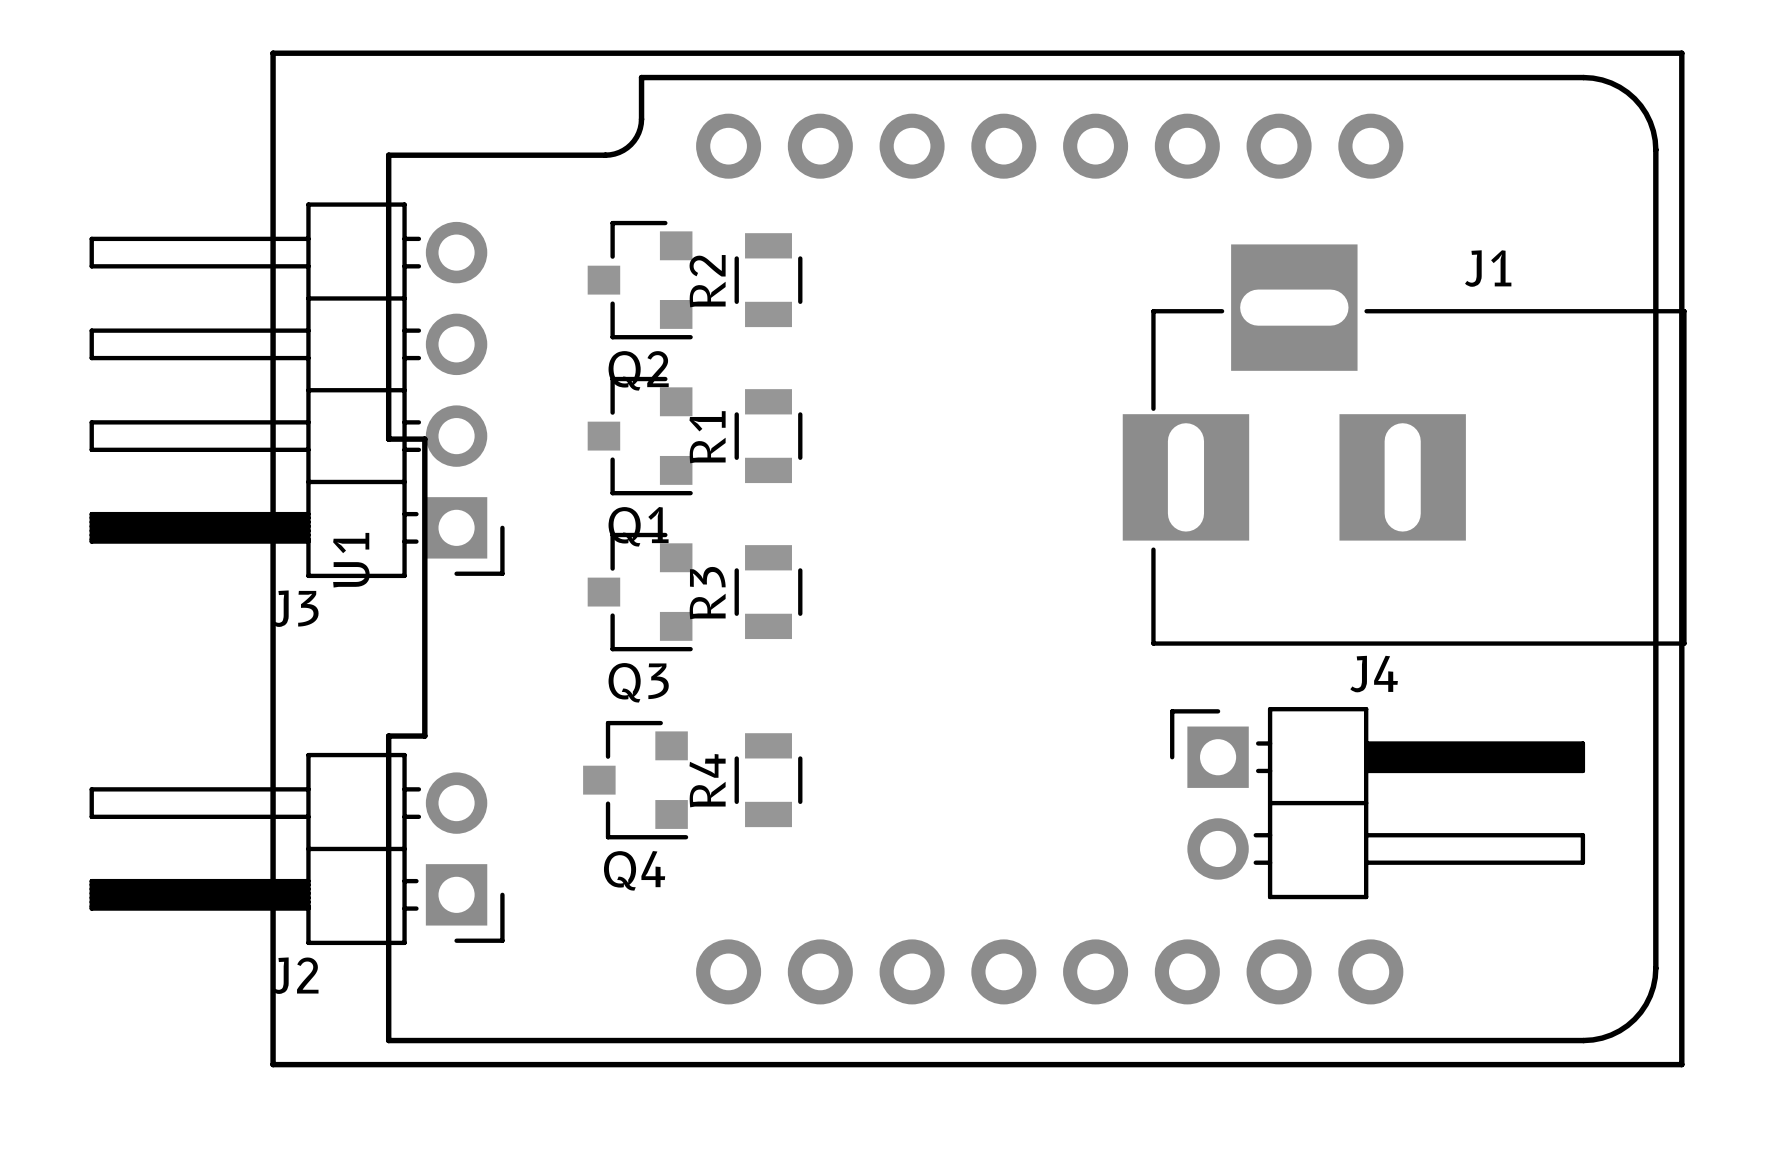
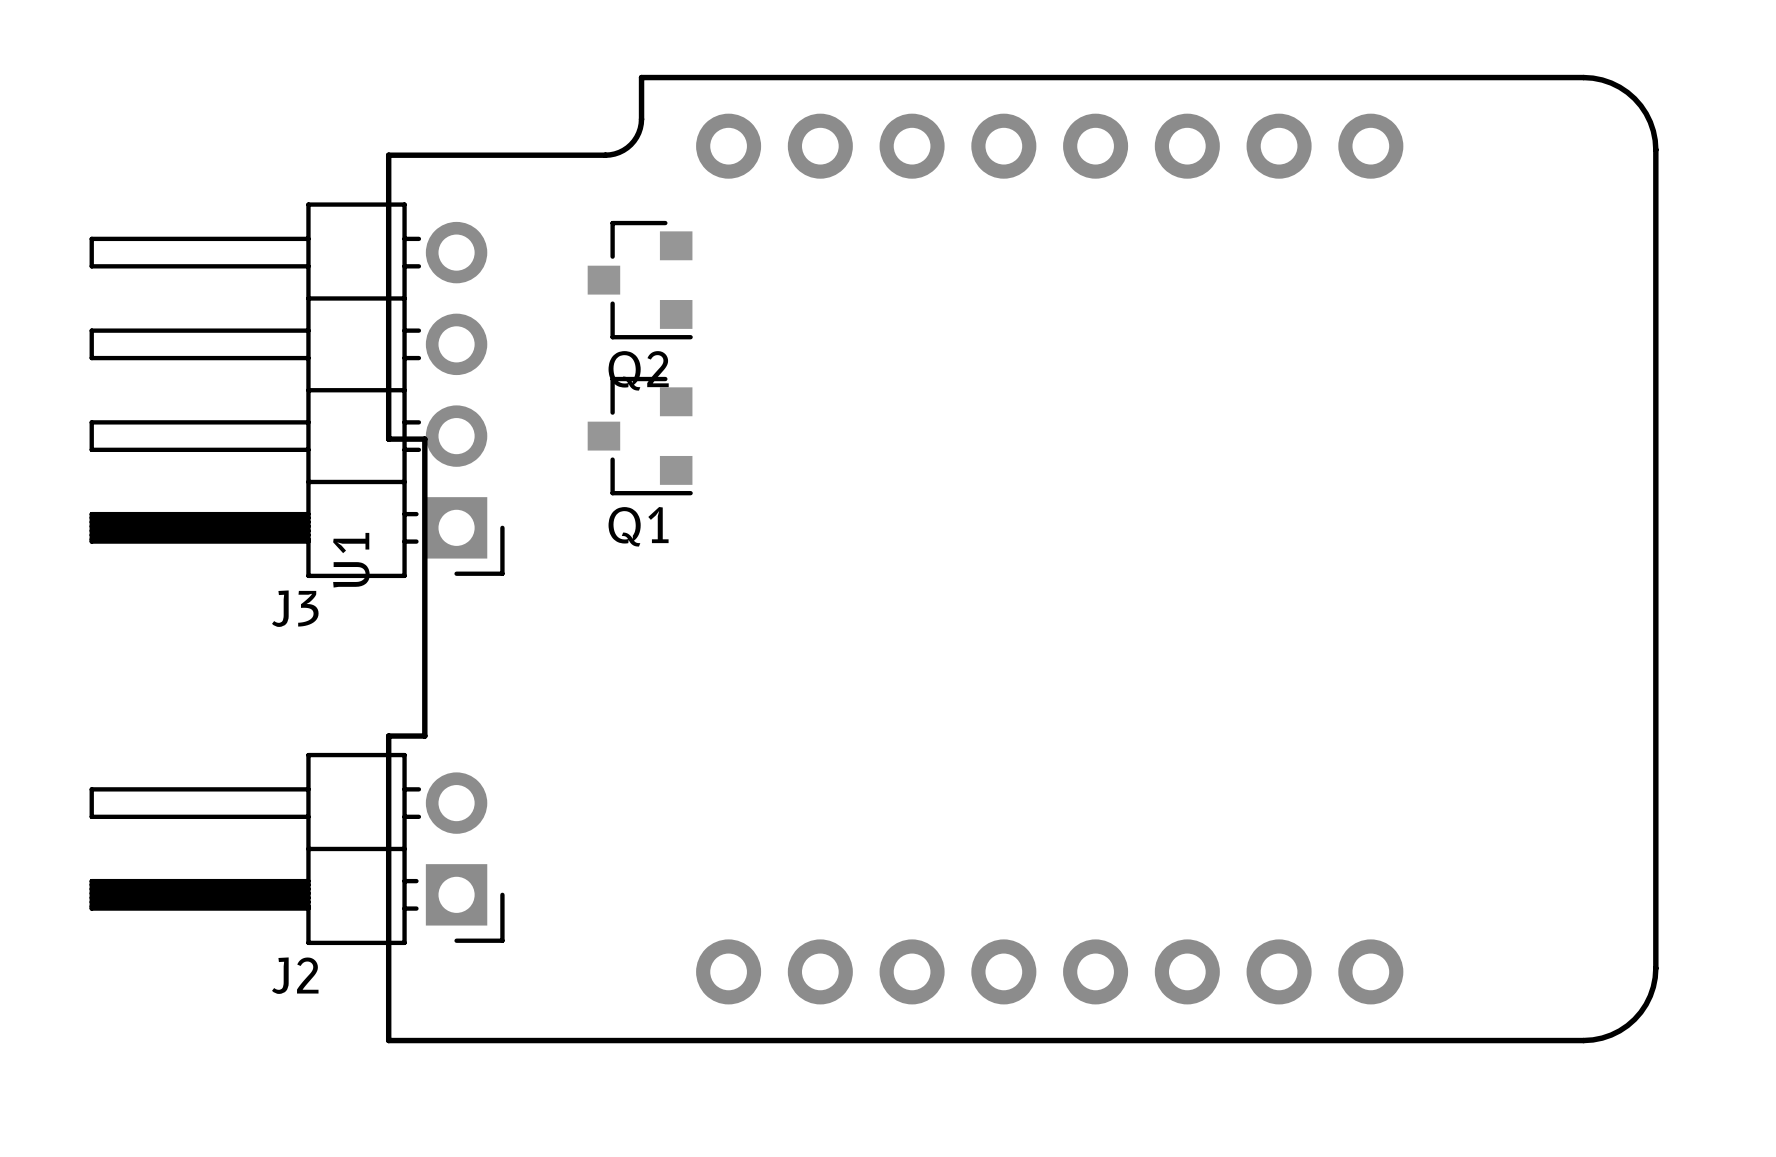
board edge: (273, 53) (273, 1064) (1681, 1064) (1681, 53) (273, 53) -> none
R2: (768, 280) -> none
R1: (768, 436) -> none
J1: (1404, 445) -> none
Q3: (640, 592) -> none
R3: (768, 592) -> none
Q4: (635, 780) -> none
R4: (768, 780) -> none
J4: (1377, 803) -> none

